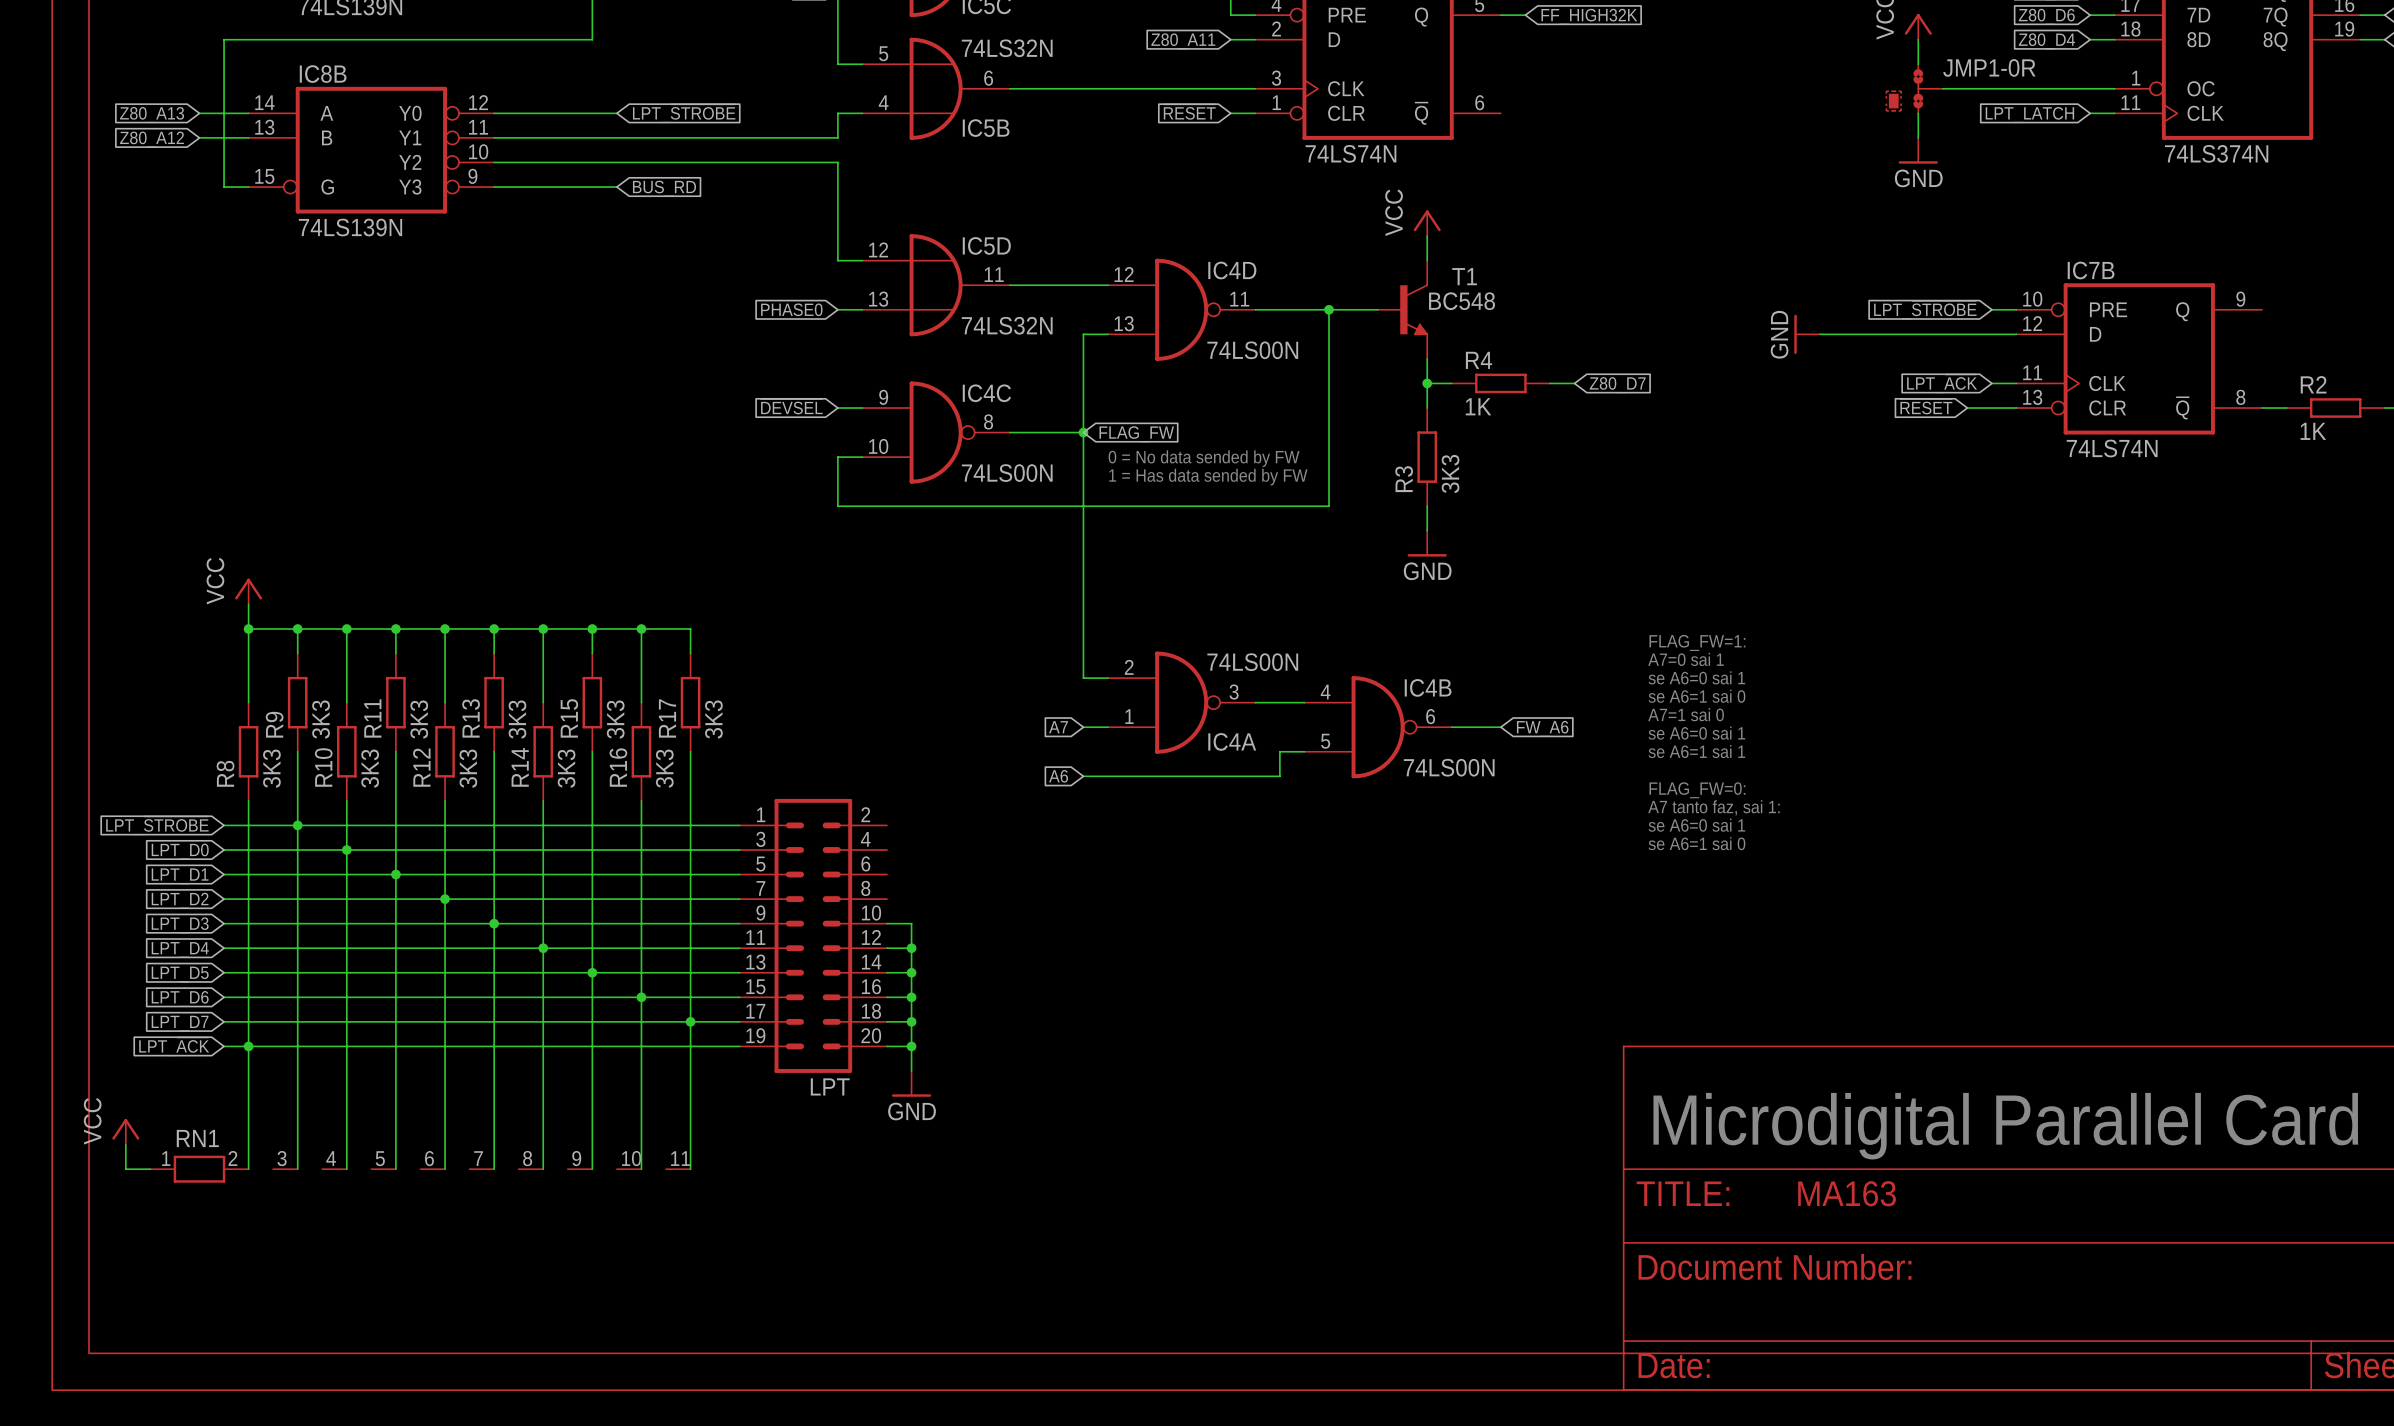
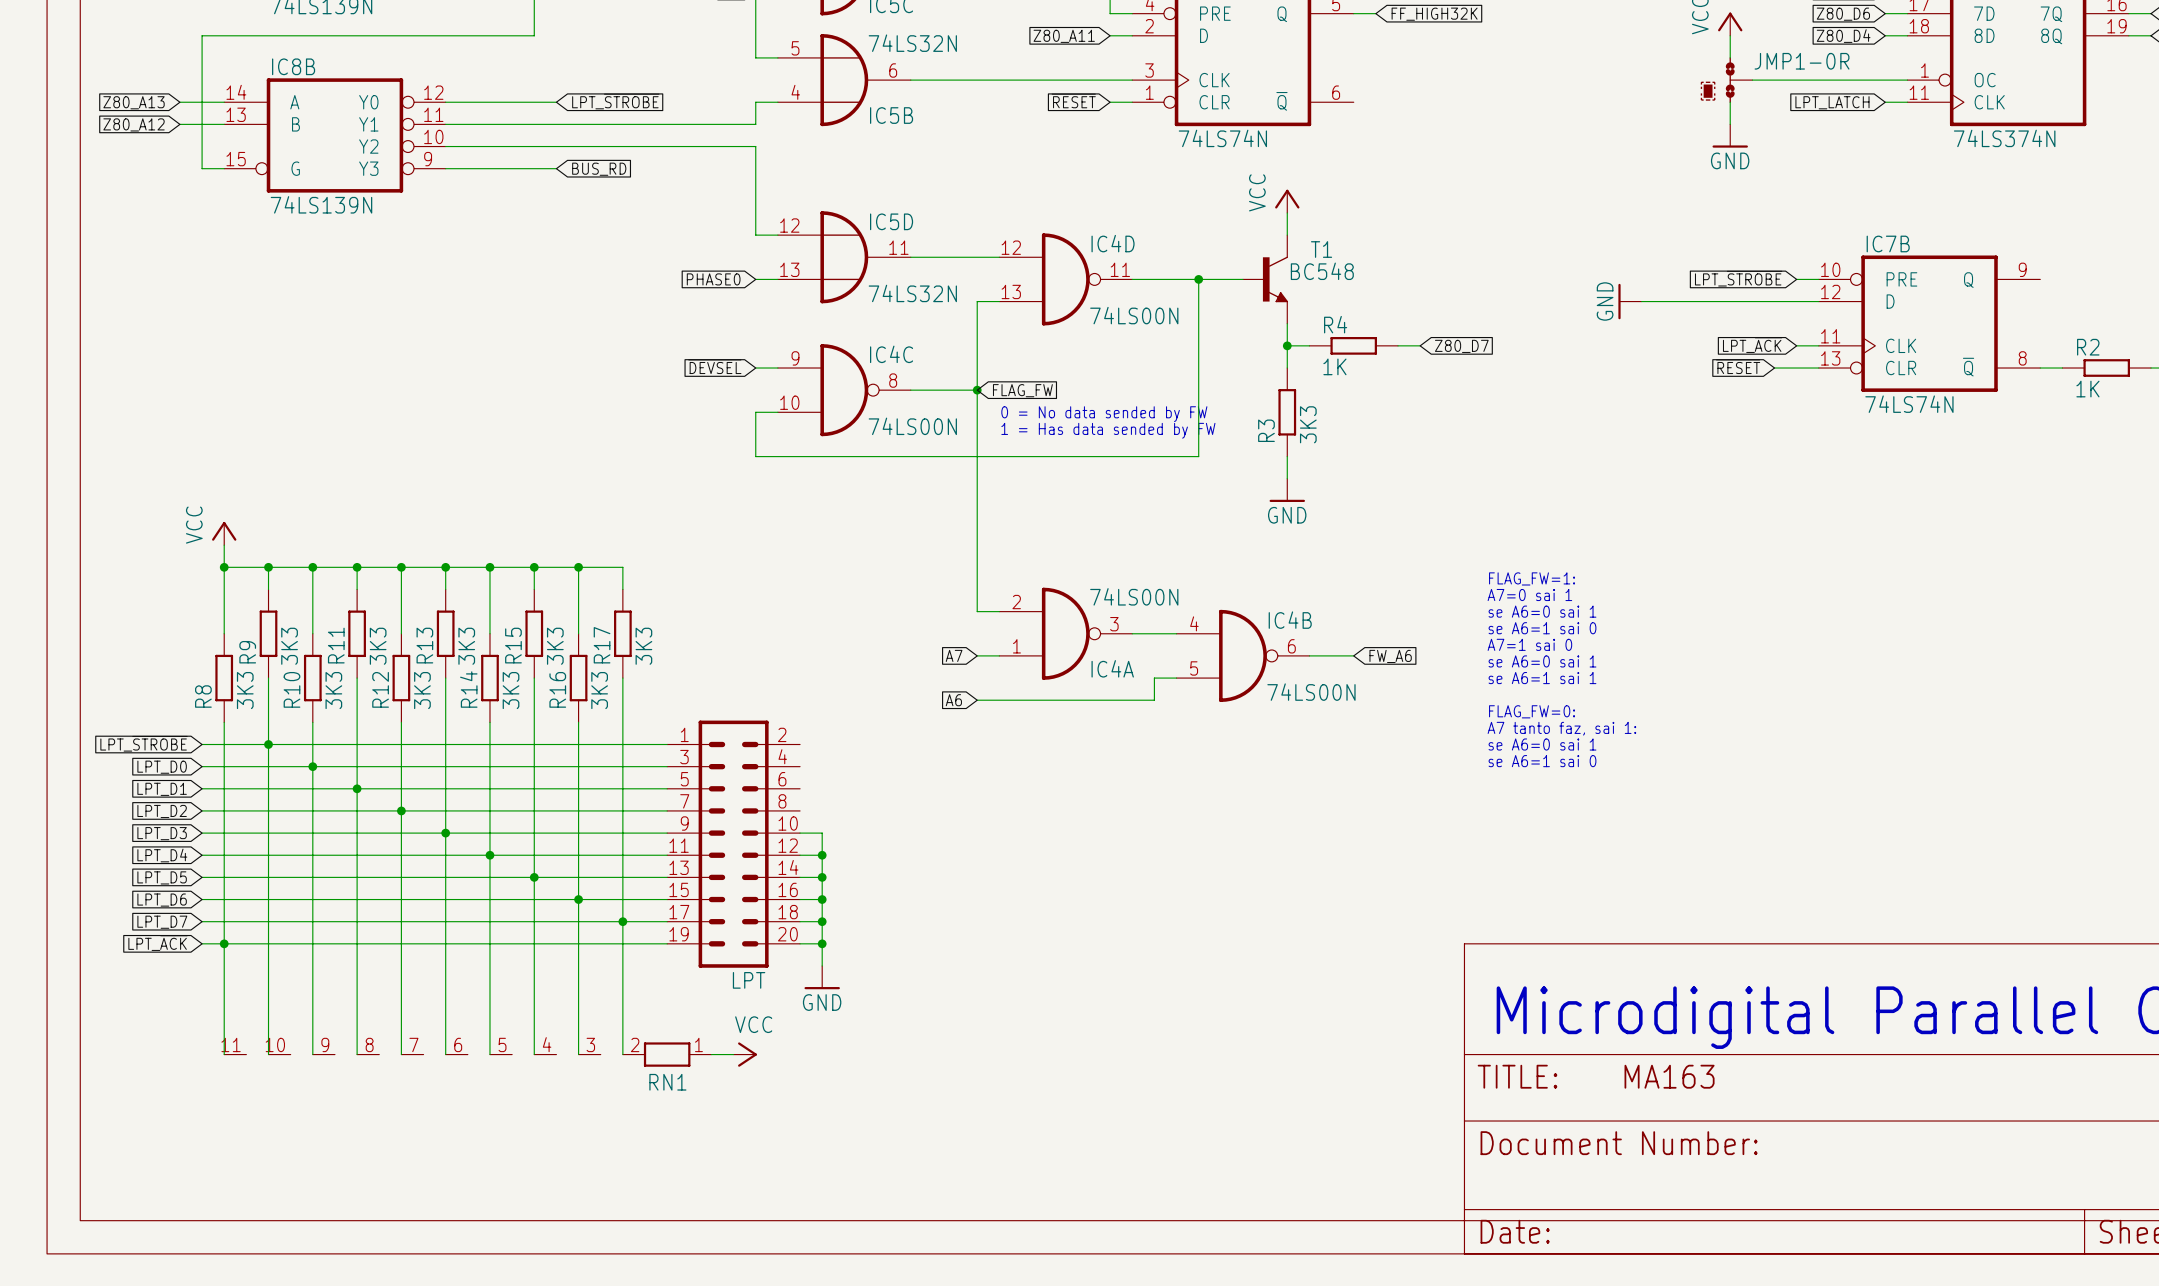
power symbol: VCC (125, 1131) -> none
wire: (125, 1144) (125, 1169) (150, 1169) -> none
RN1 rotation: 0° (199, 1169) -> 180° (667, 1054)
wire: none -> (711, 1054) (733, 1054)
power symbol: none -> VCC (745, 1054)

